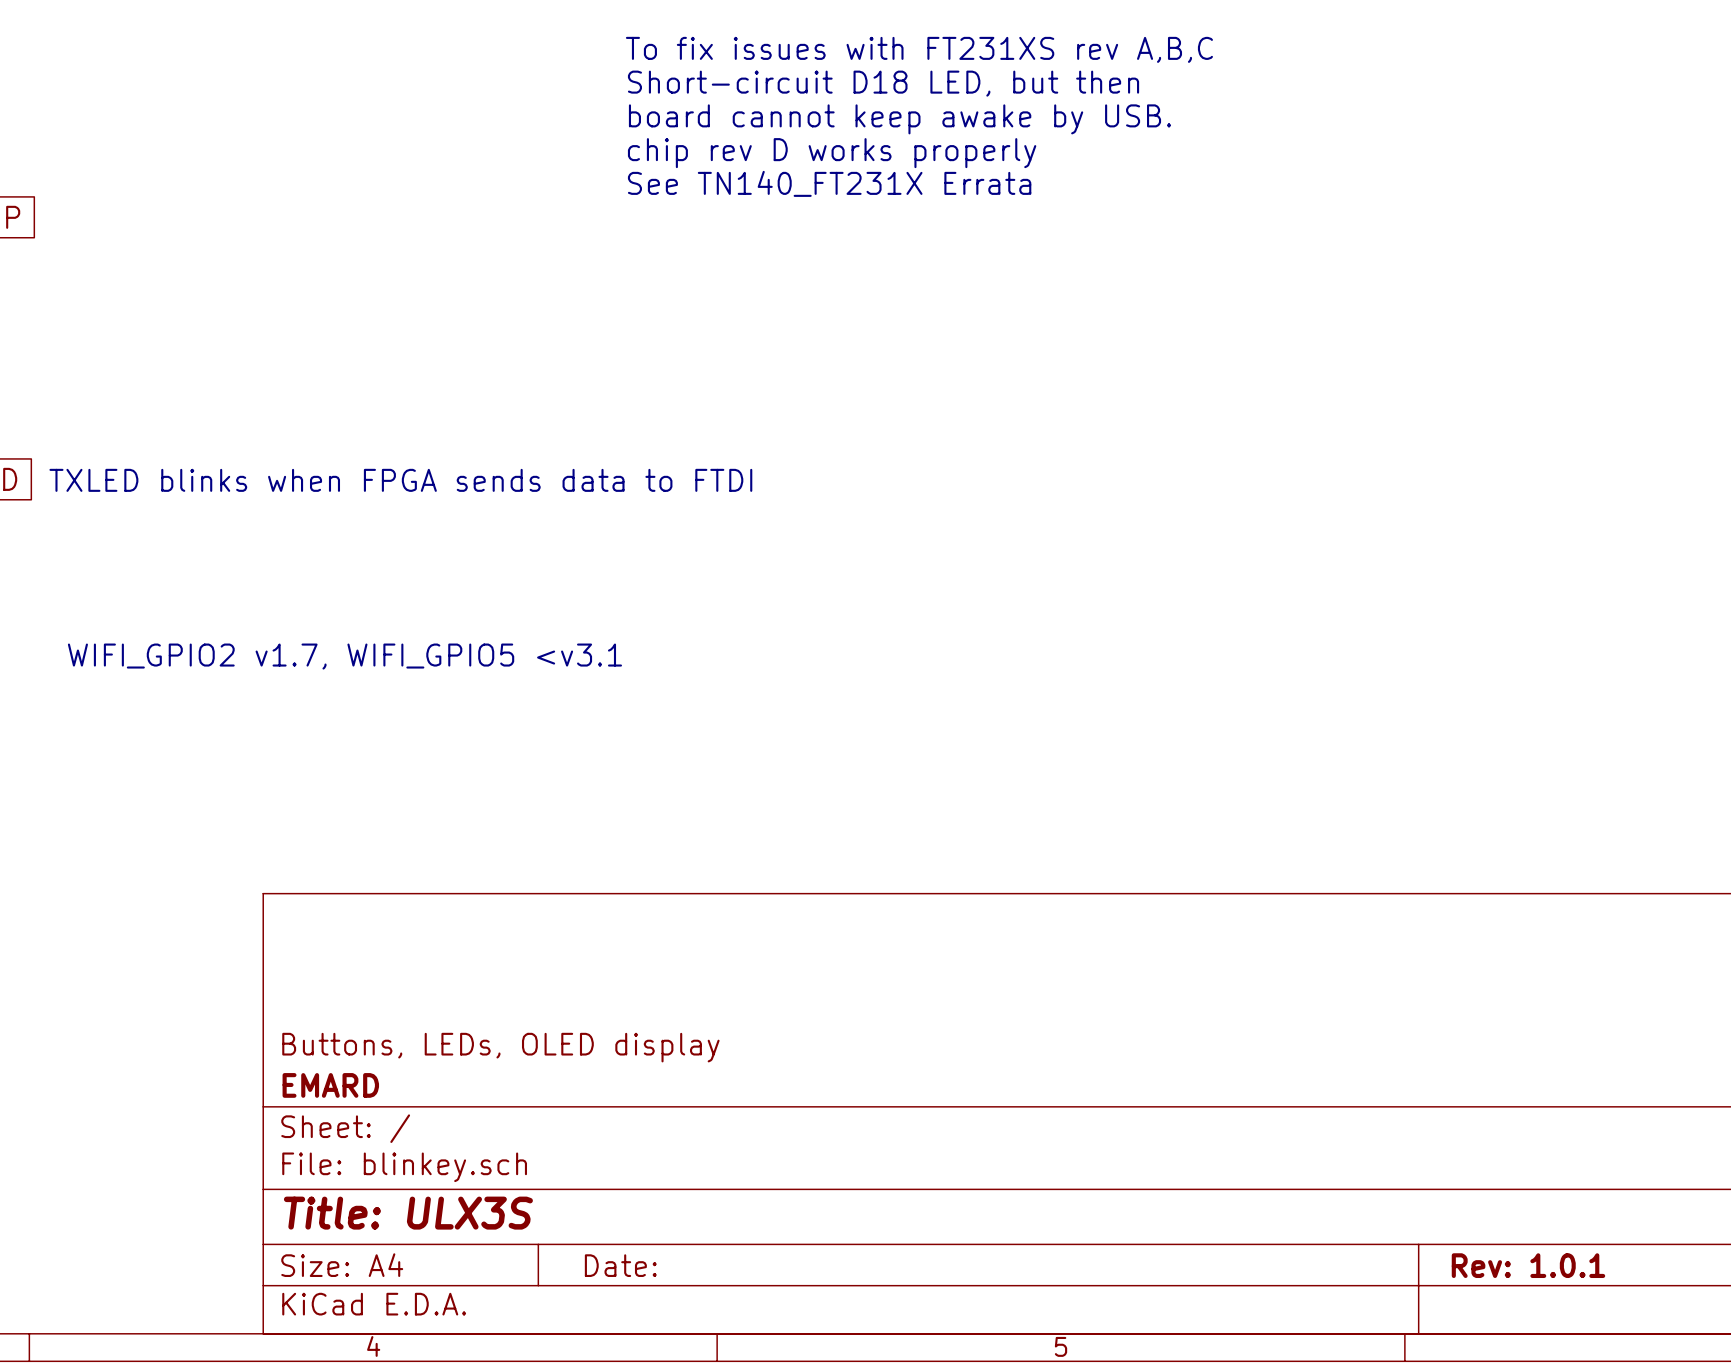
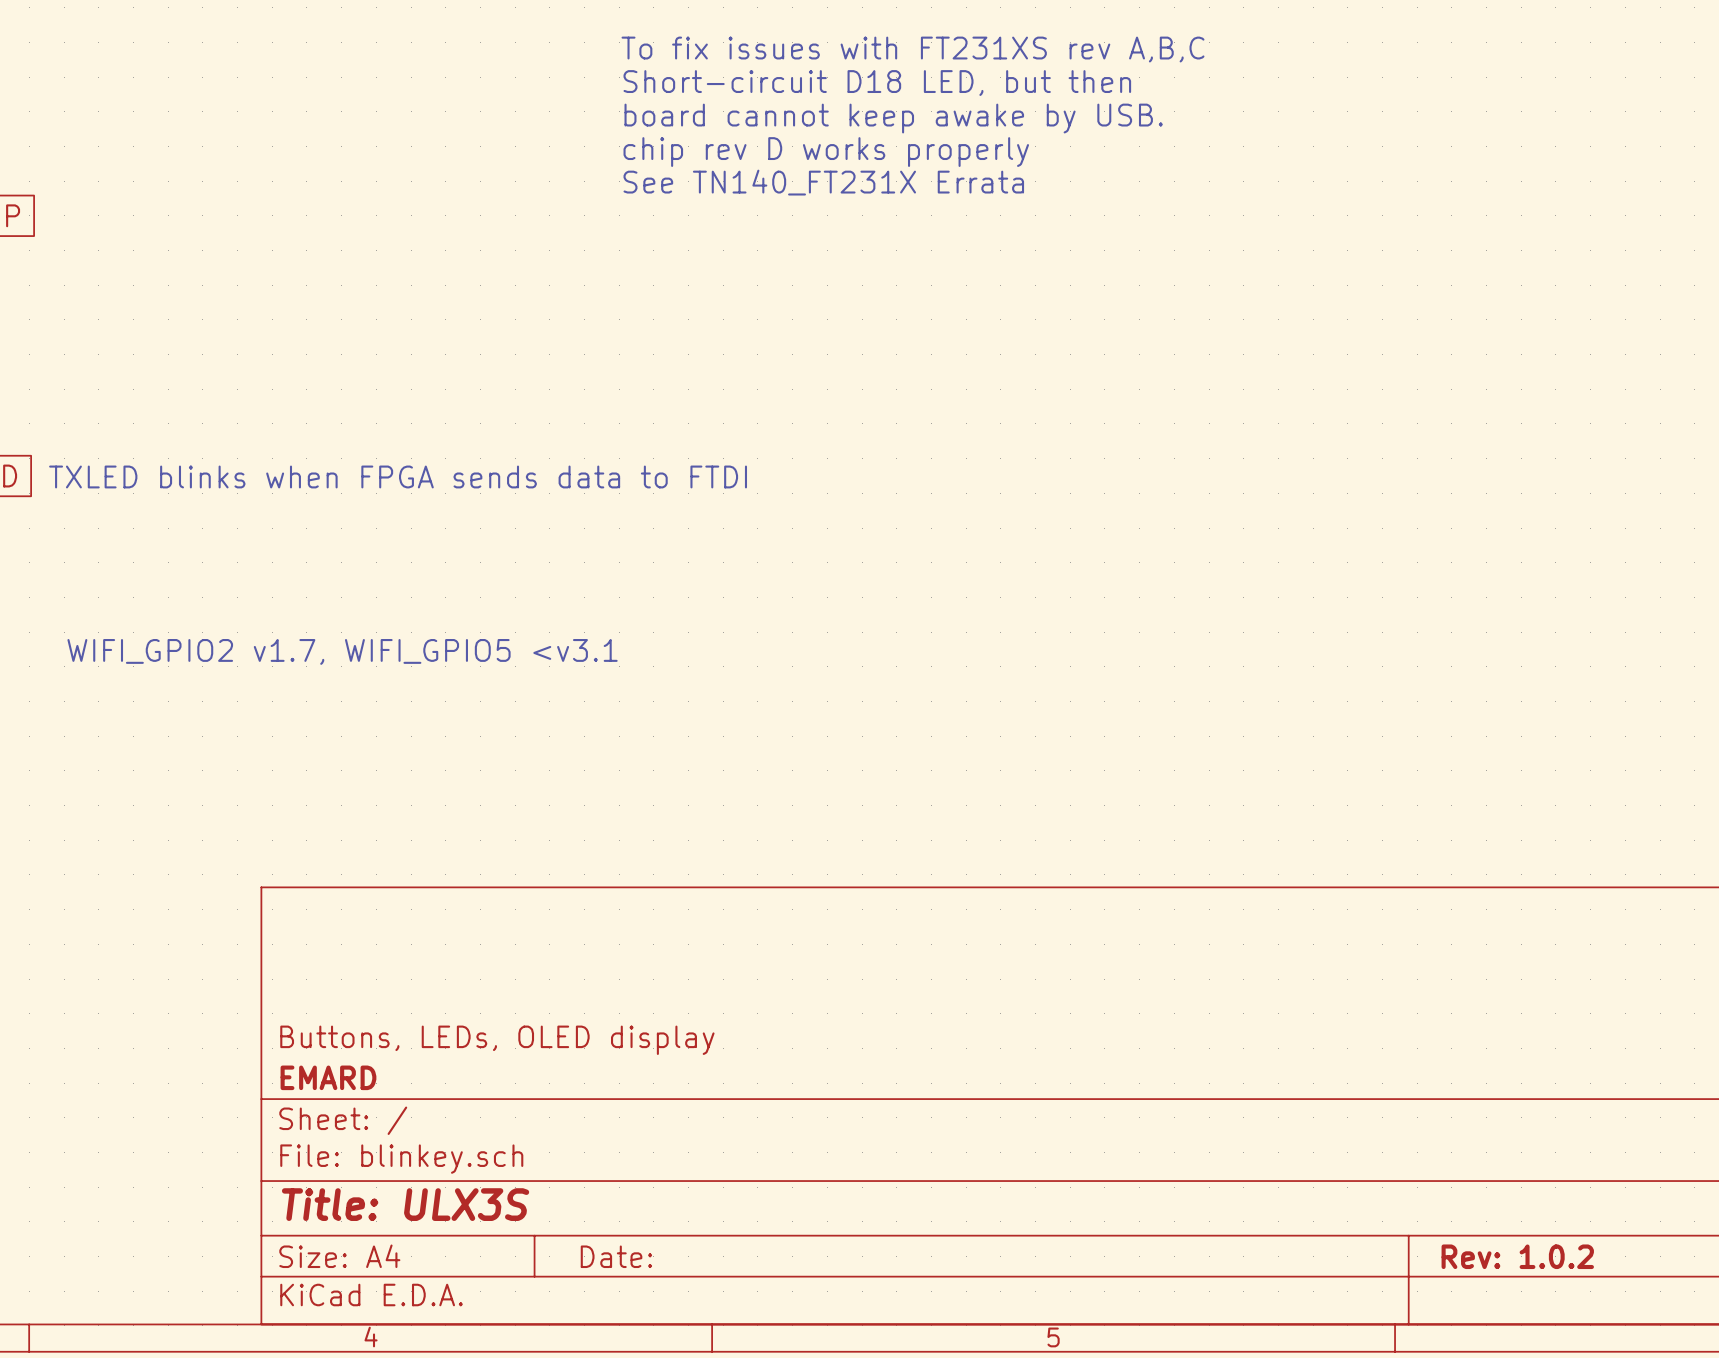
title block: Rev: 1.0.1 (1528, 1265) -> Rev: 1.0.2 (1517, 1256)

